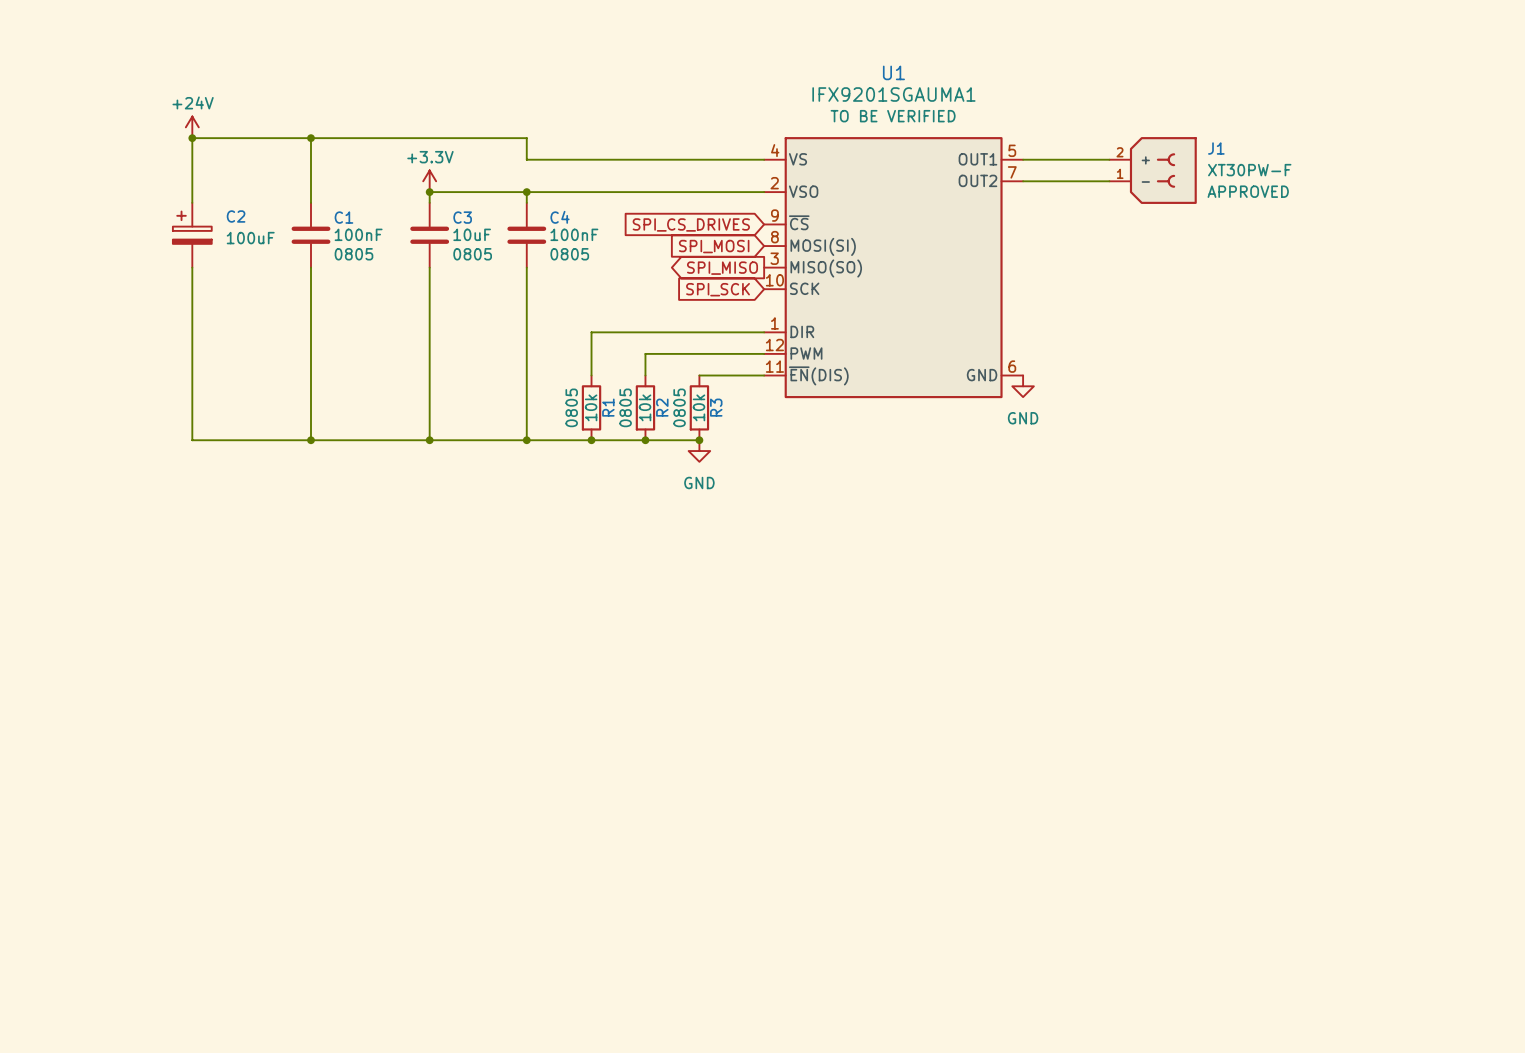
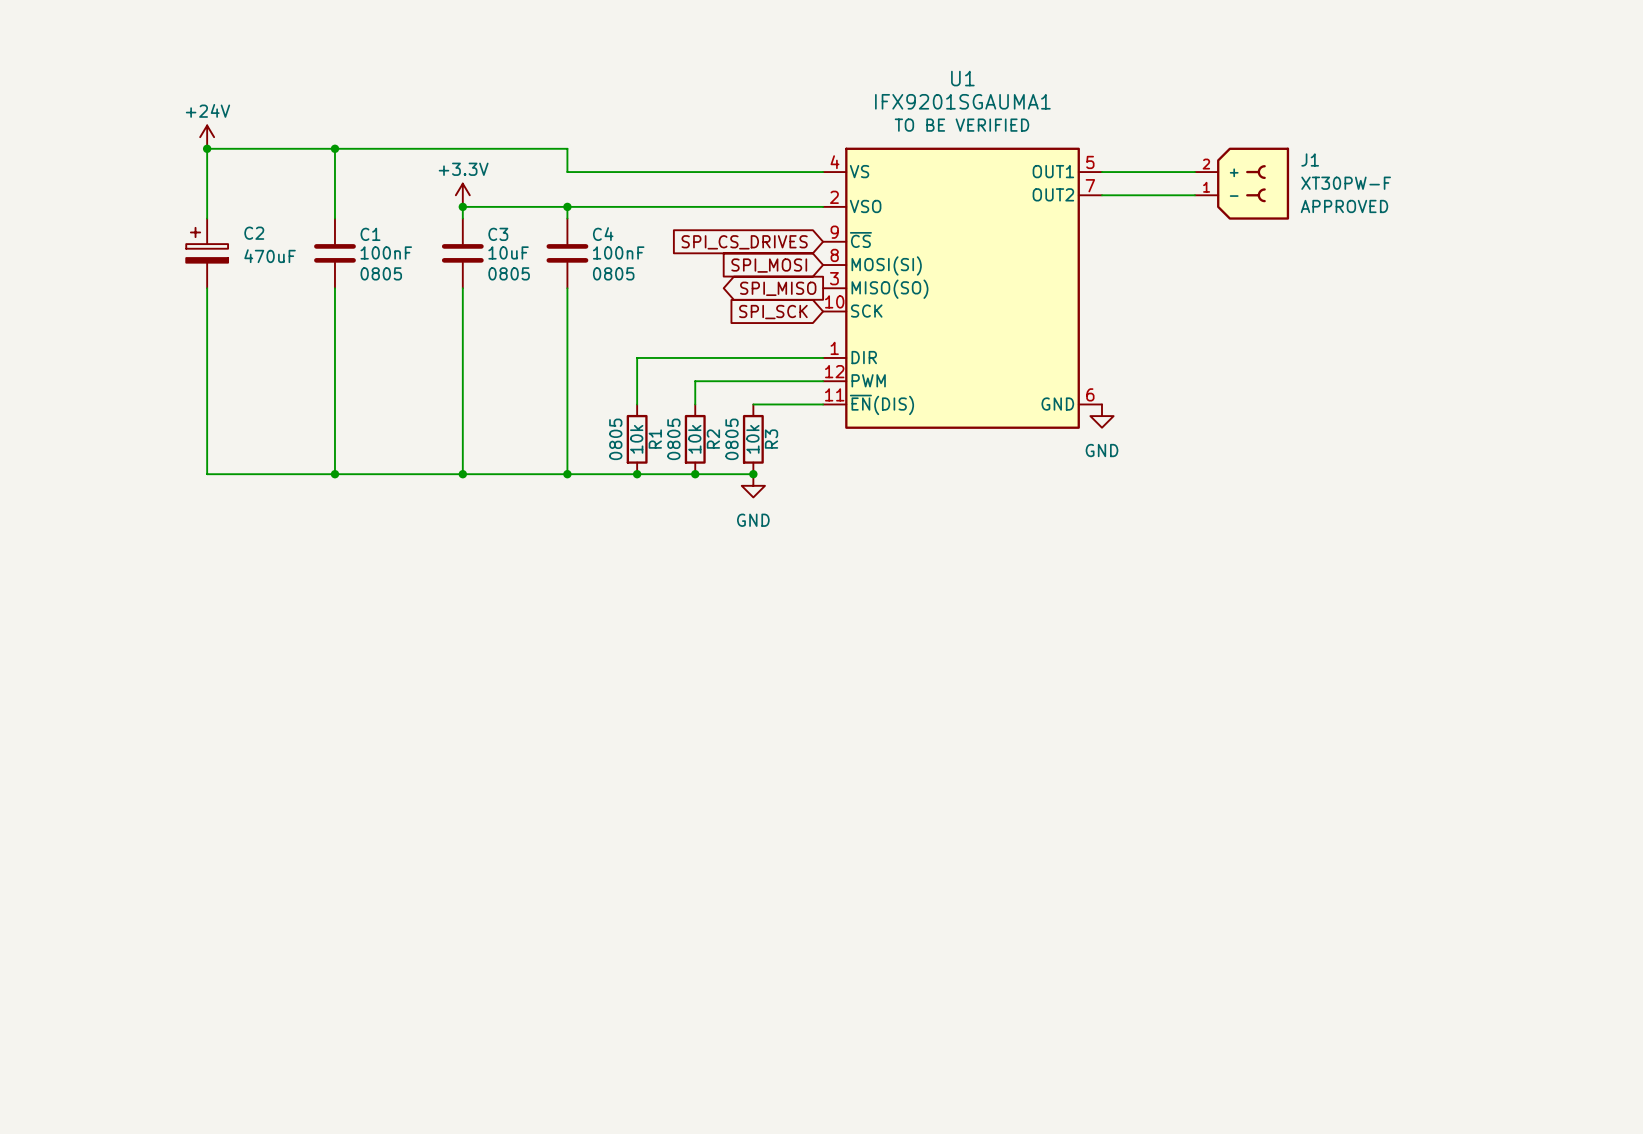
C2 value: 100uF (250, 238) -> 470uF (270, 256)

